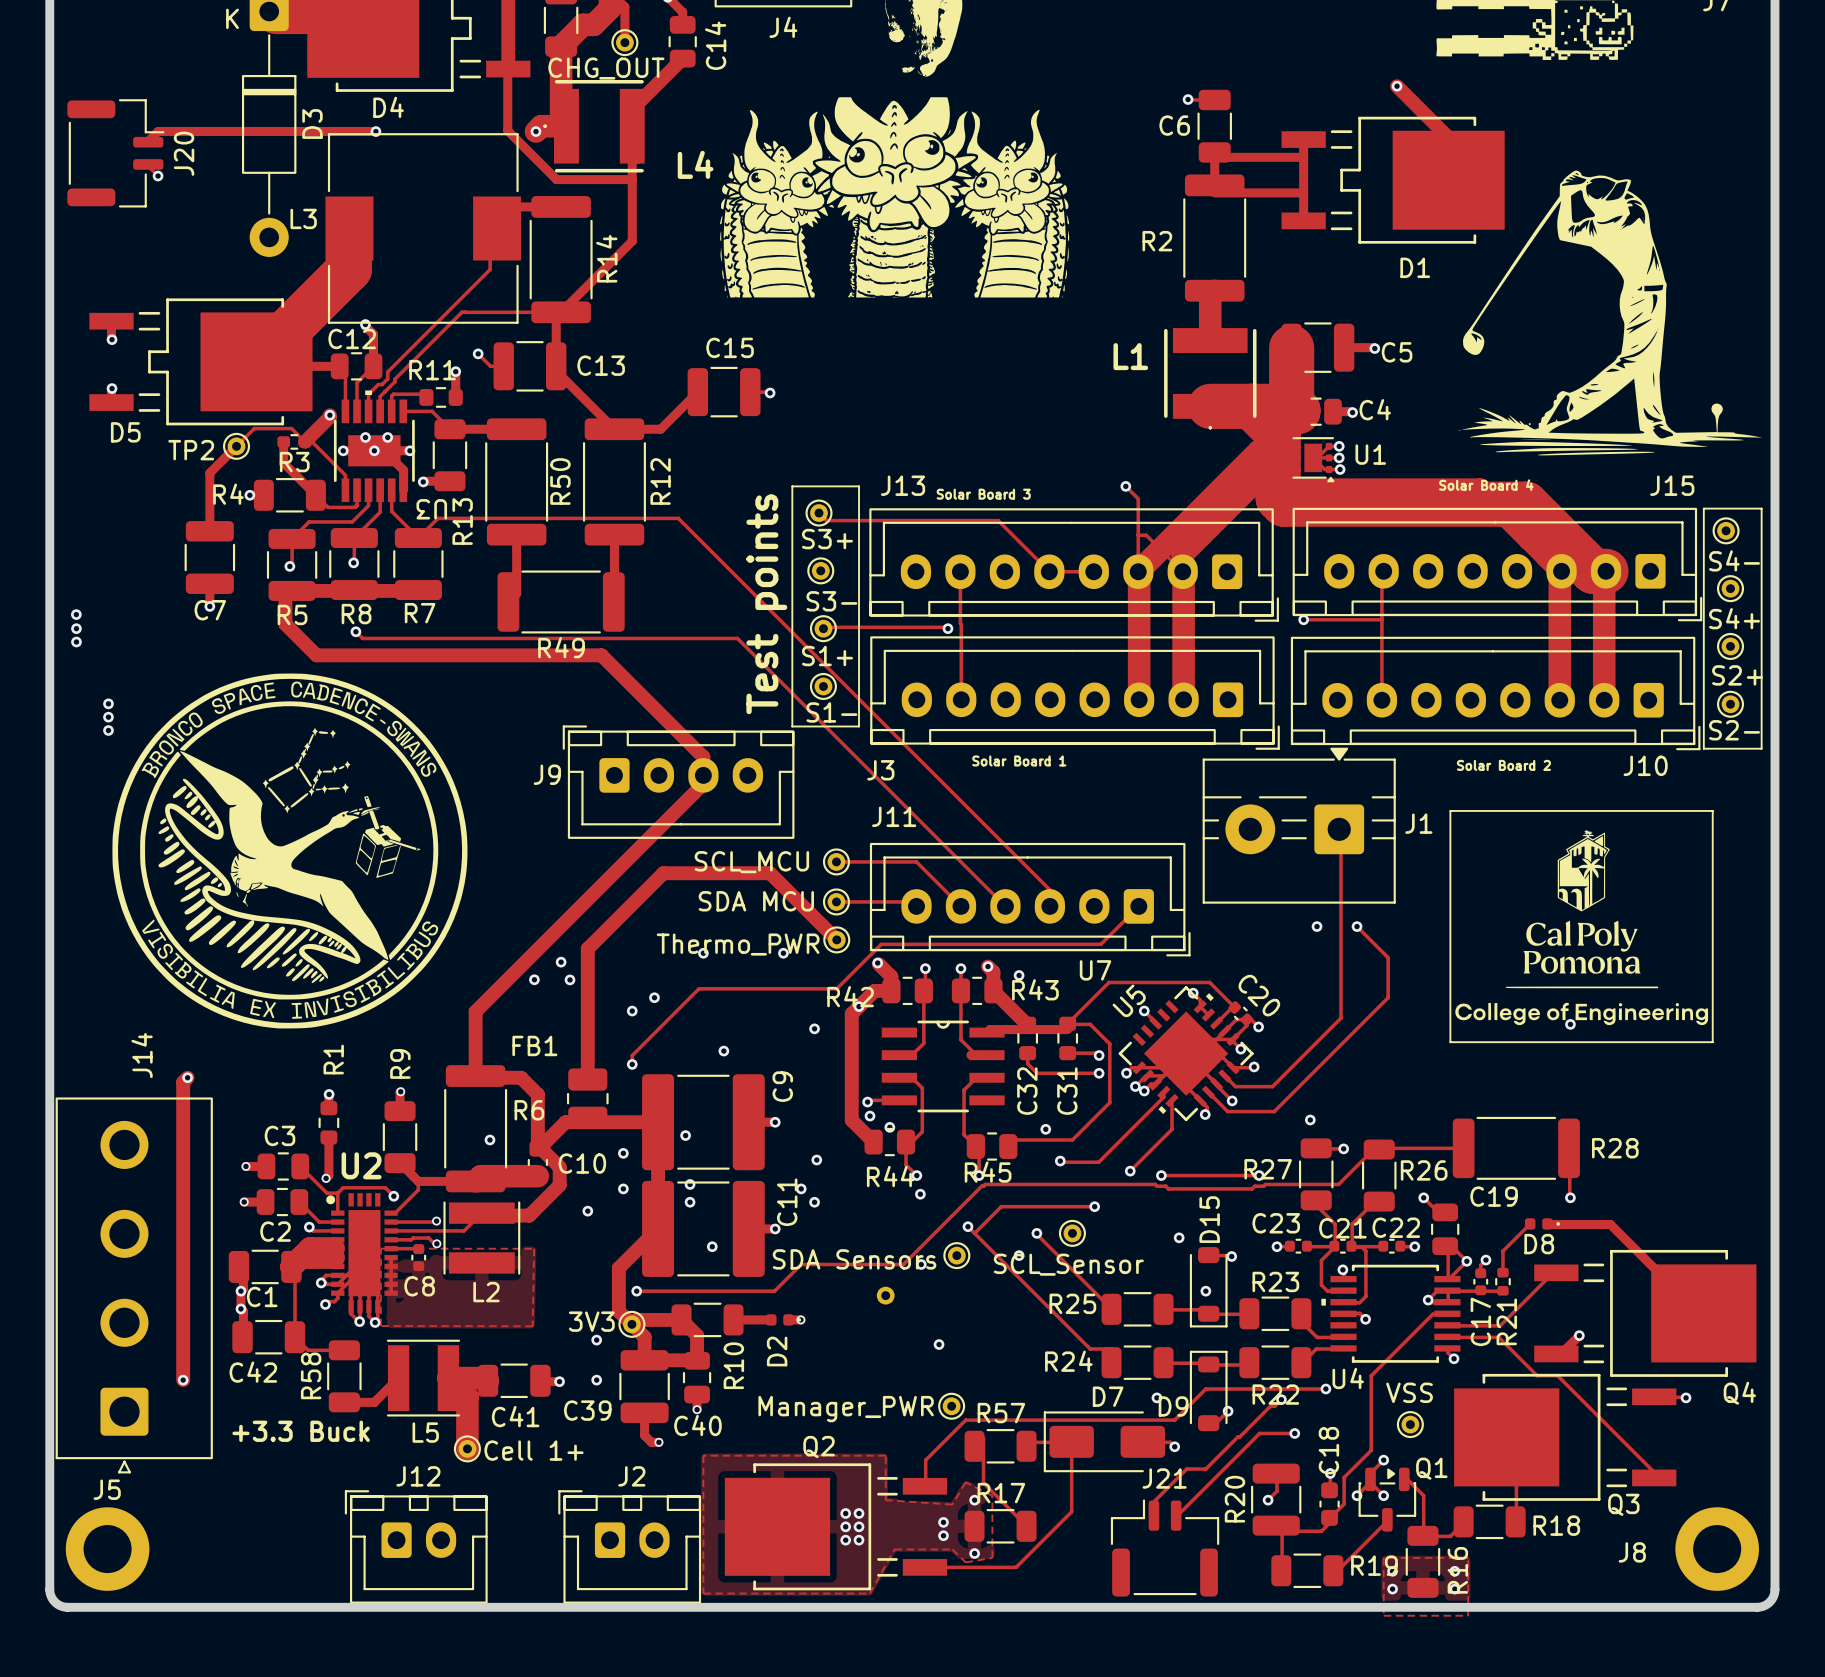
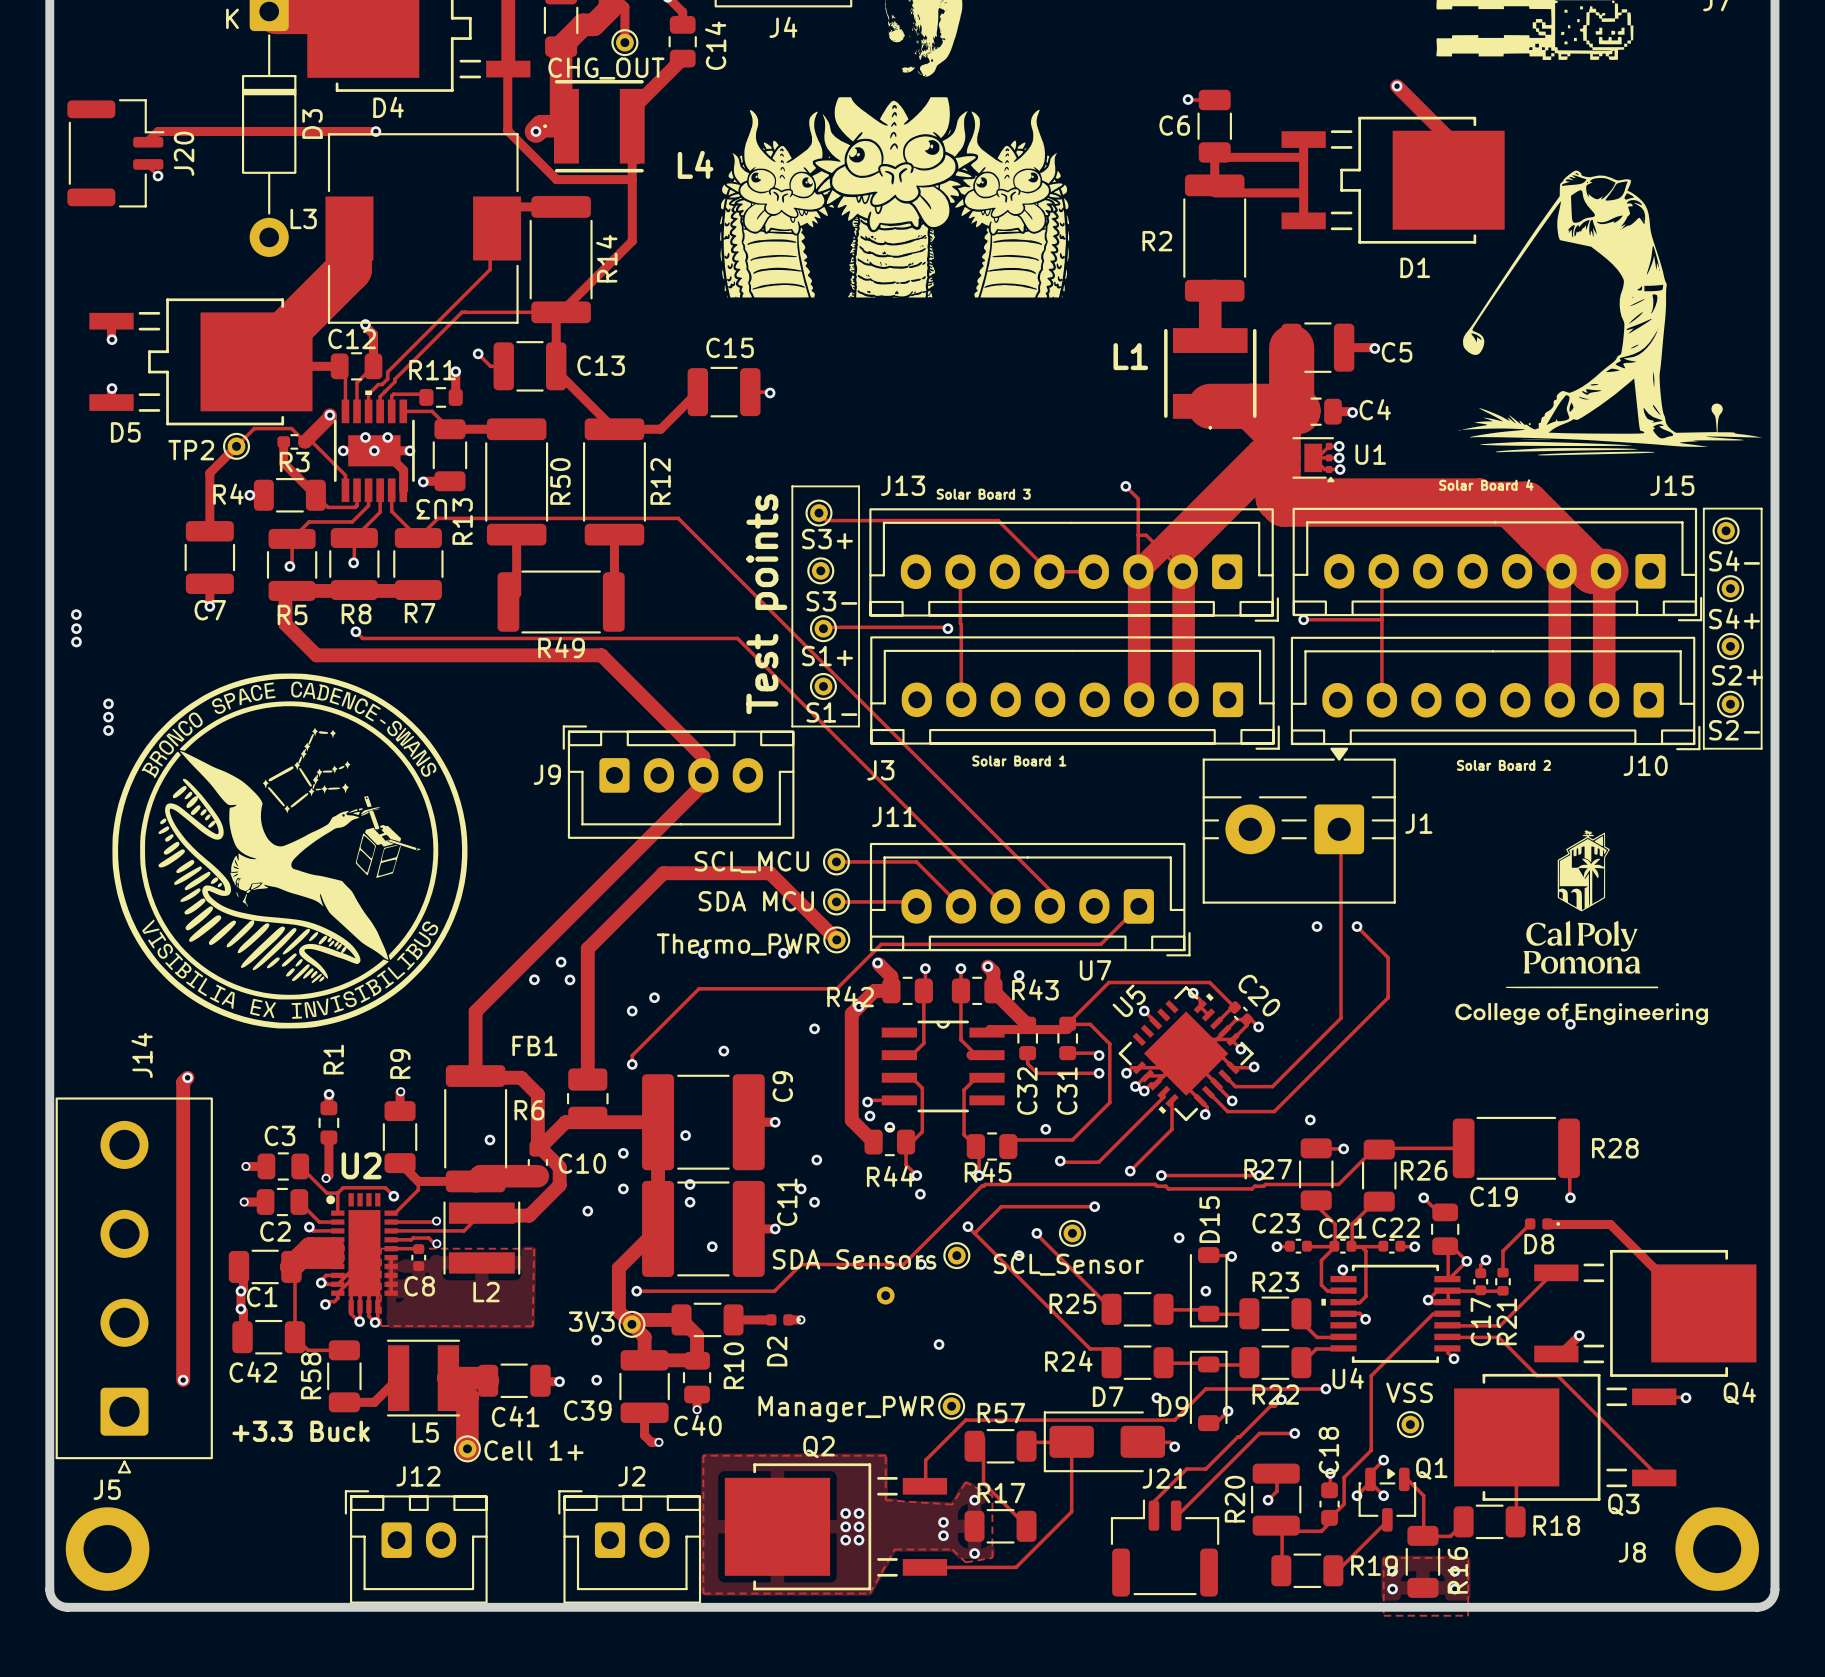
line: (1450, 810) (1712, 810) (1712, 1042) (1450, 1042) (1450, 810) -> none

